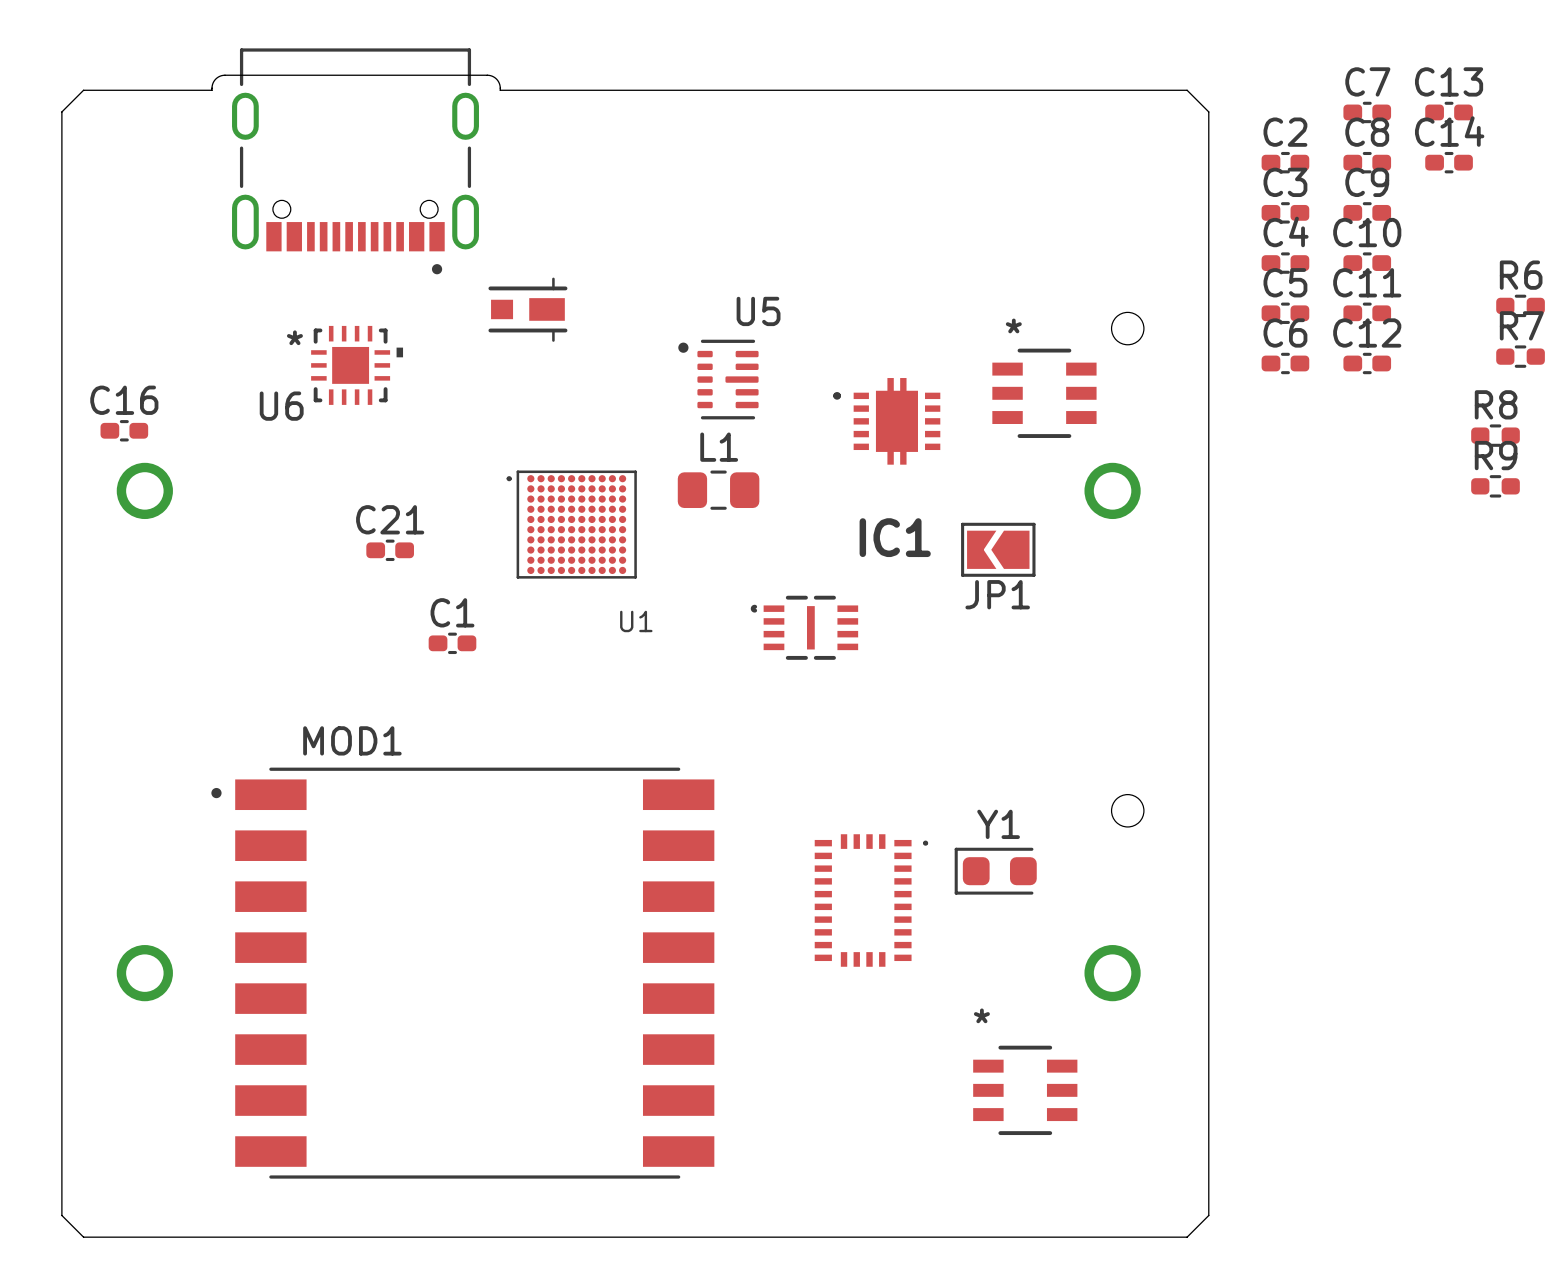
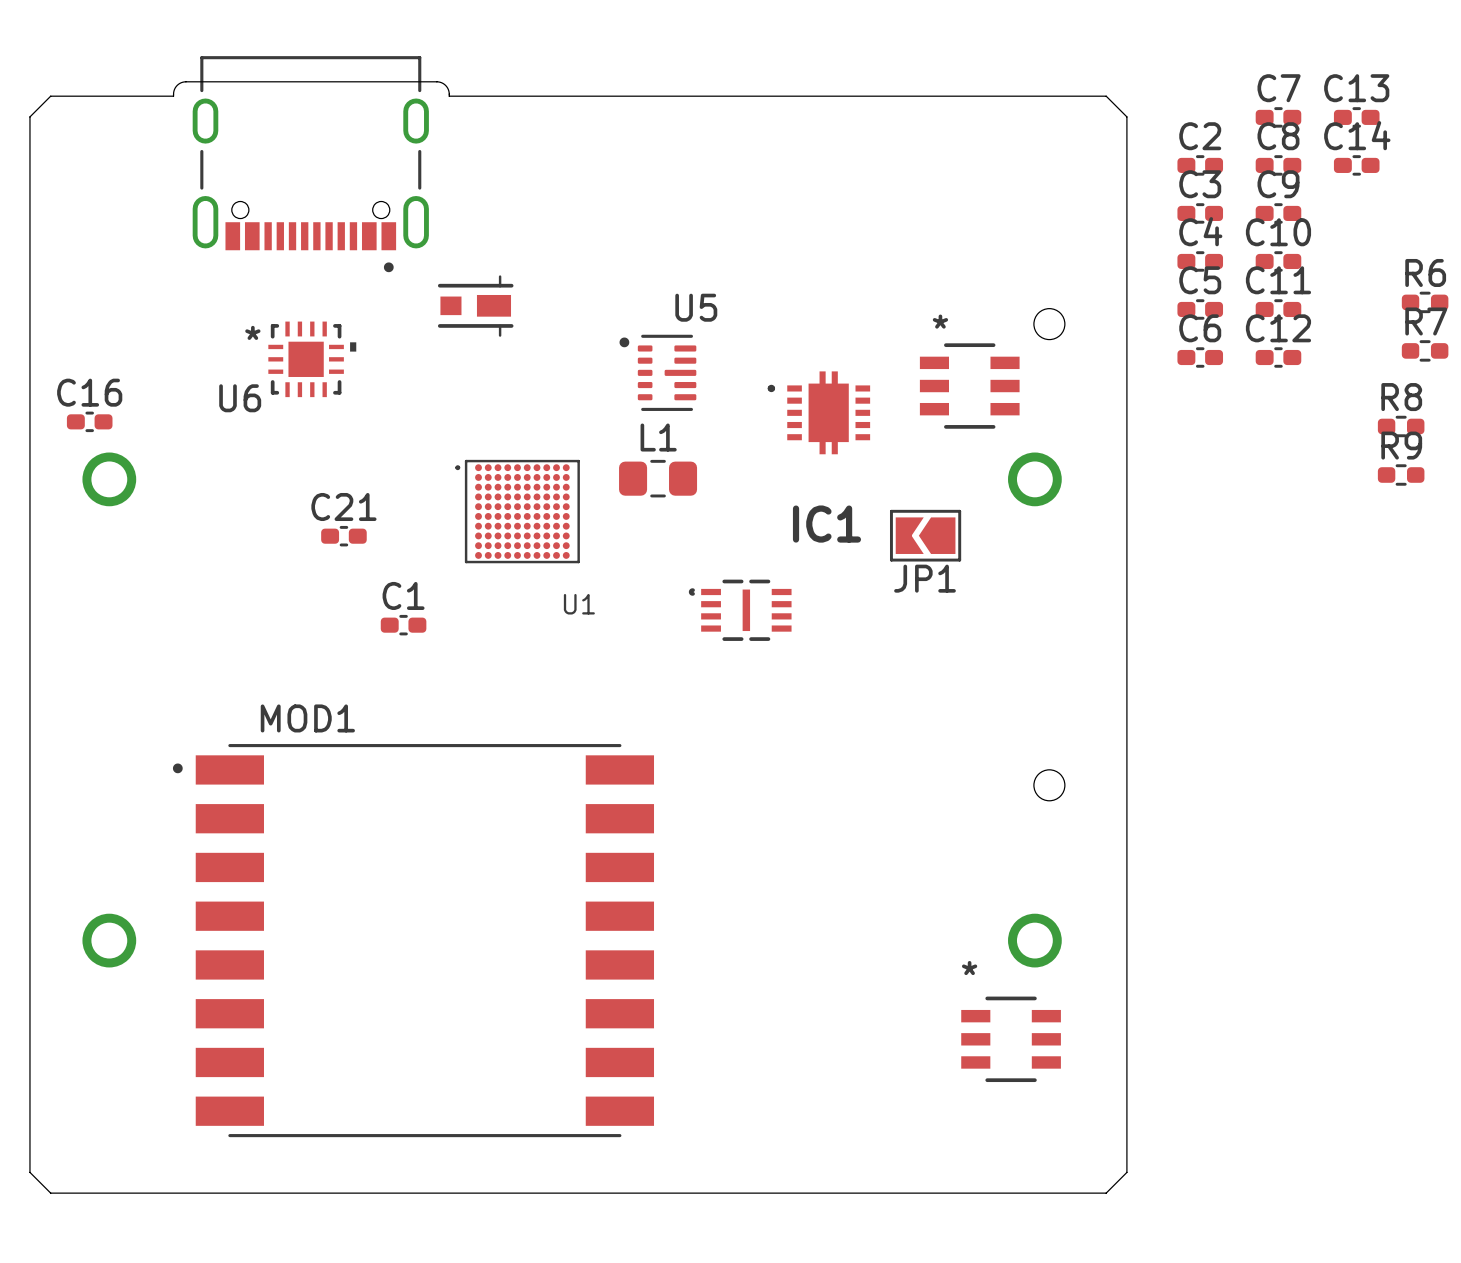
Y1: (995, 871) -> none
part: (871, 900) -> none
part position: (1025, 1090) -> (1011, 1039)

